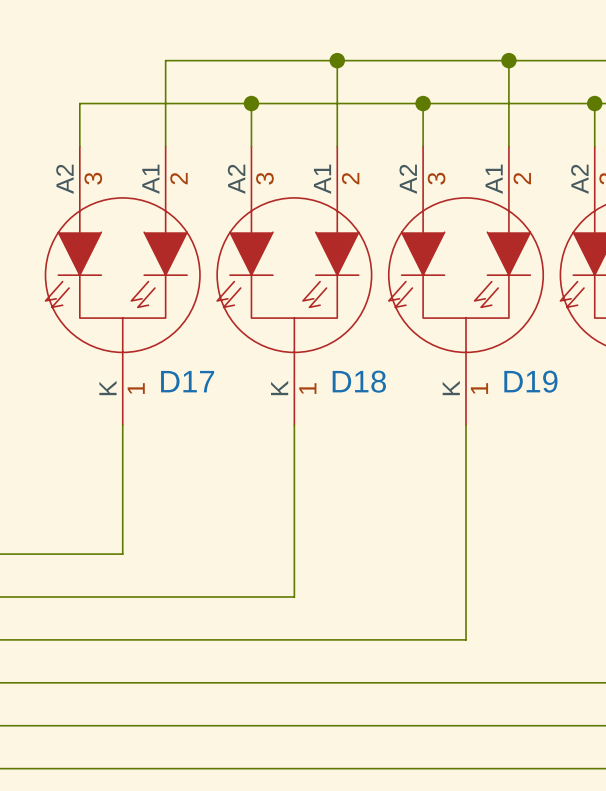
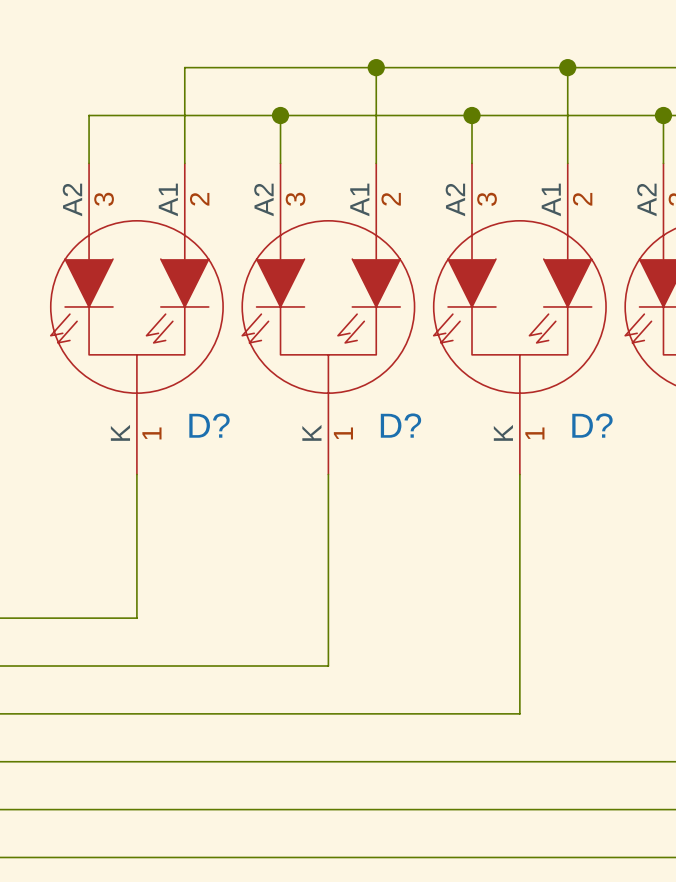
D17 name: D17 (187, 381) -> D? (209, 425)
D18 name: D18 (359, 381) -> D? (400, 425)
D19 name: D19 (530, 381) -> D? (592, 425)

